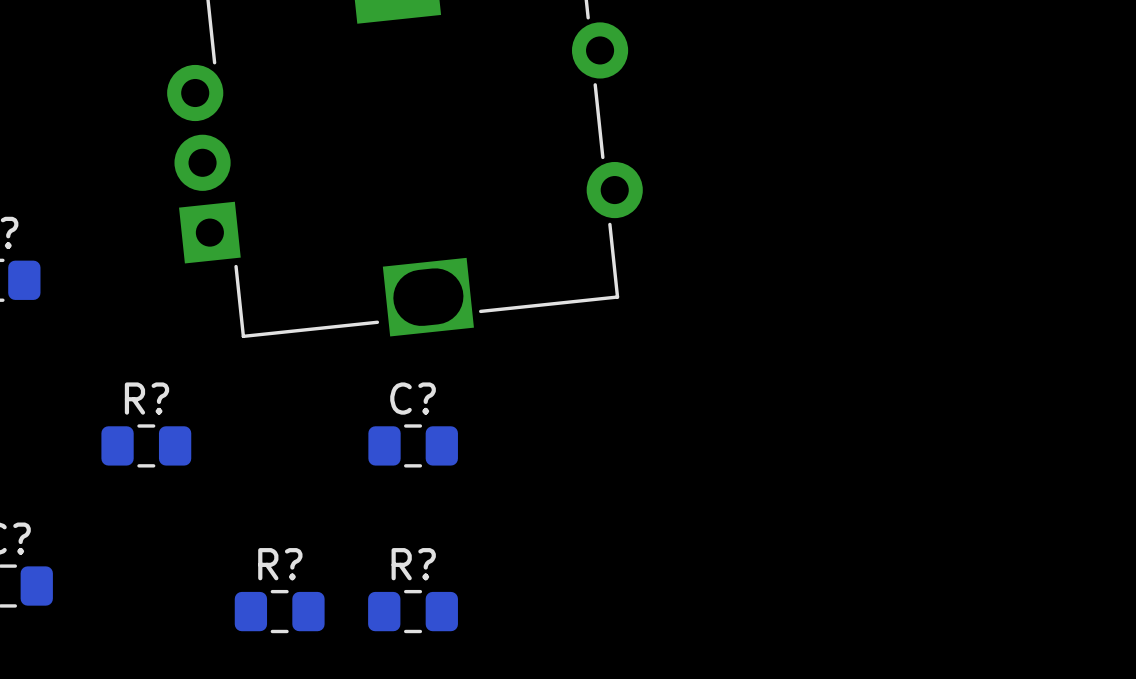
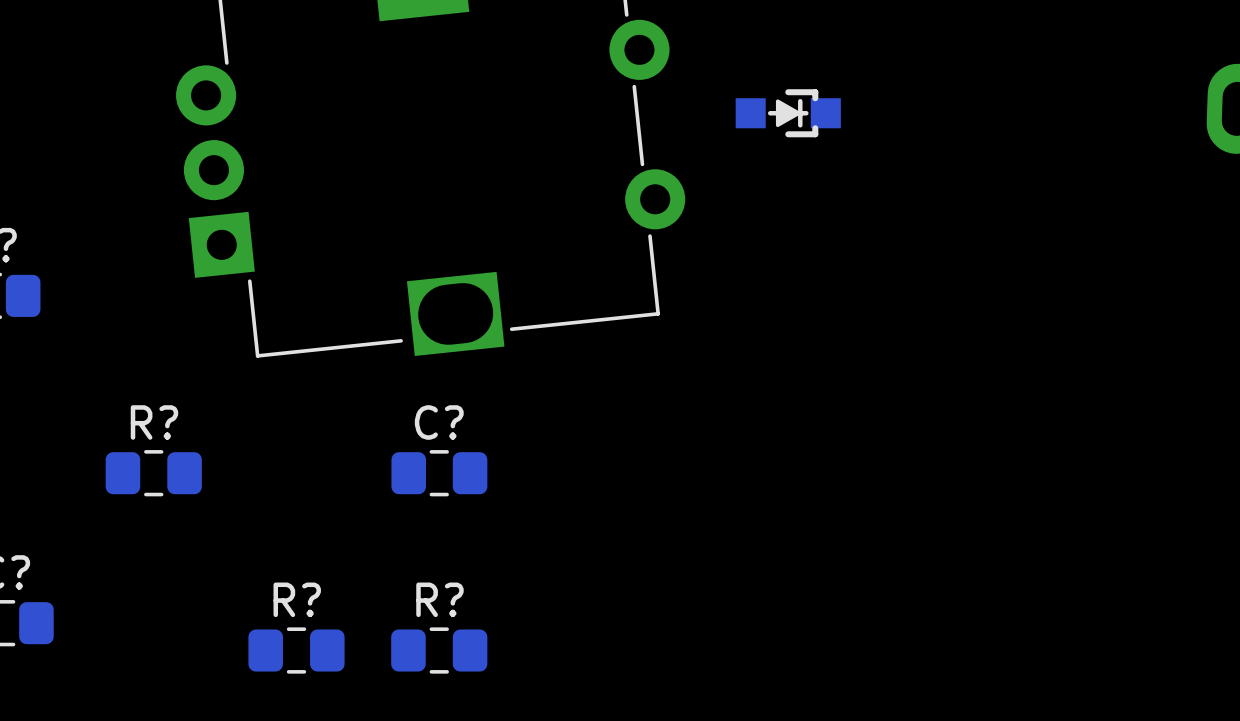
part: none -> (788, 113)

